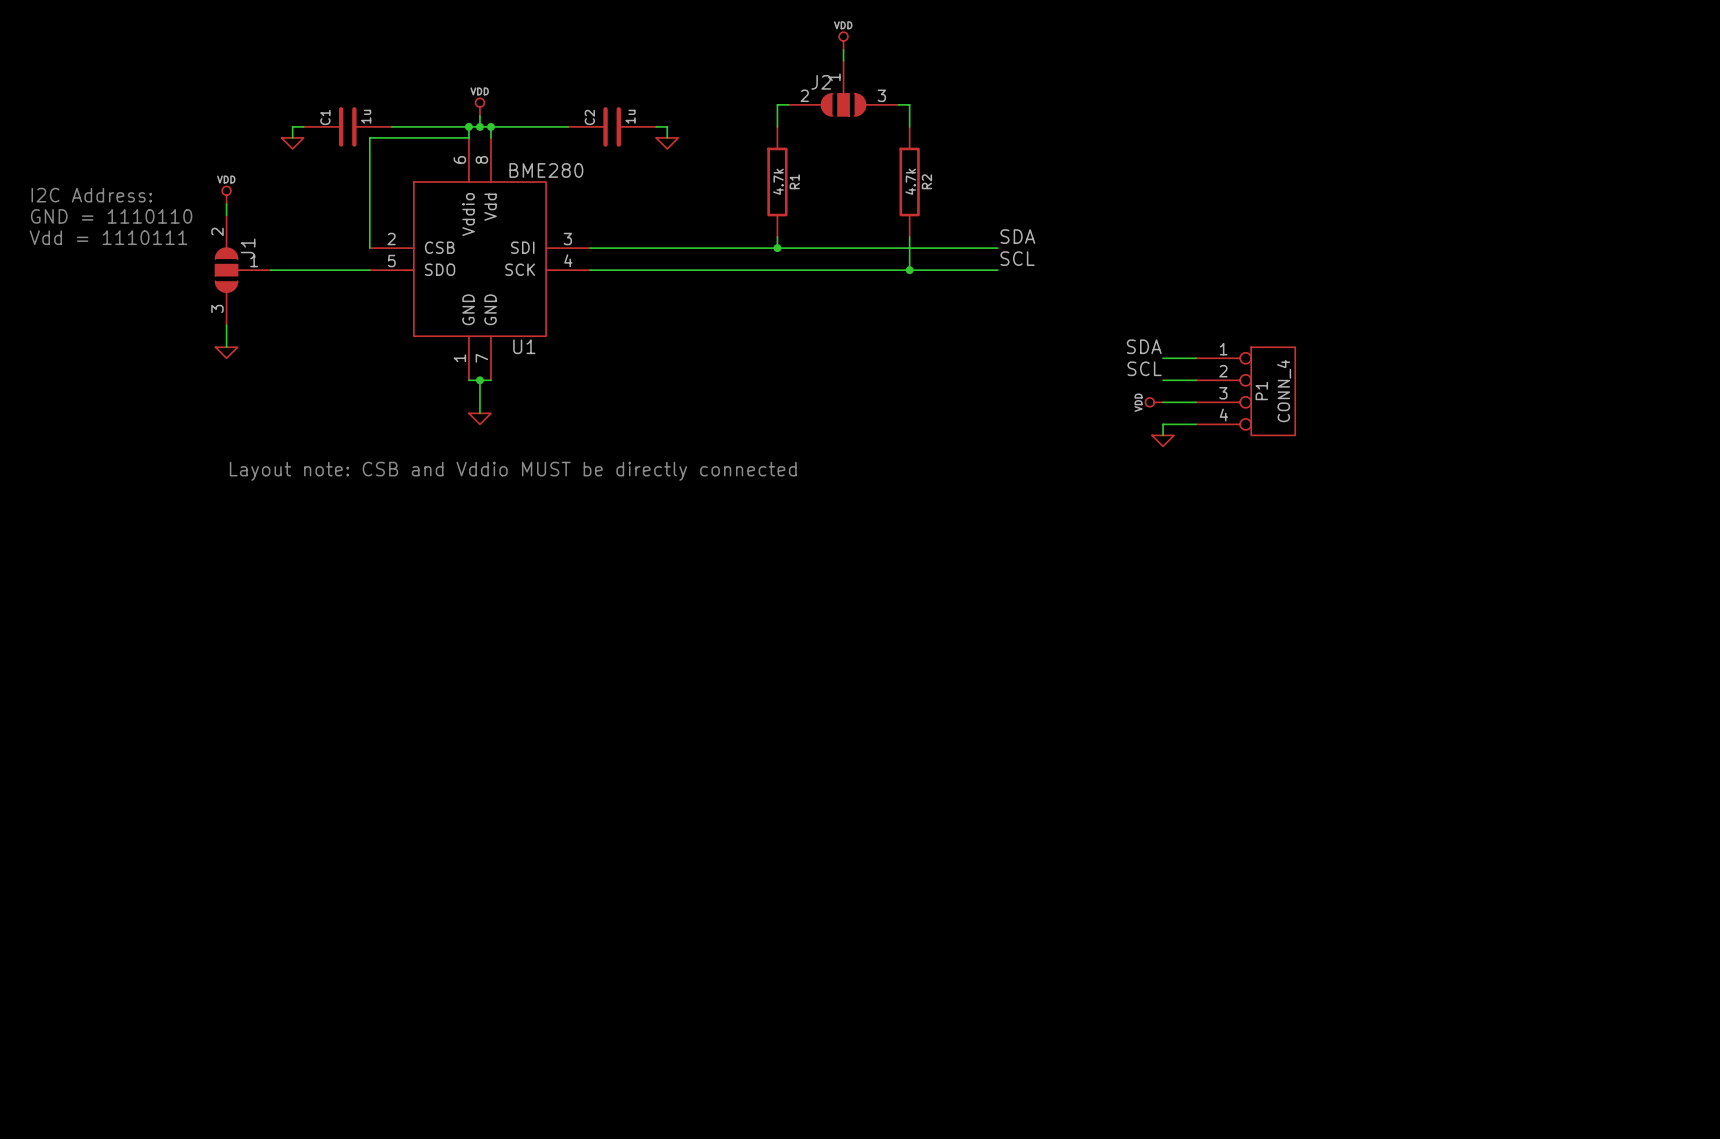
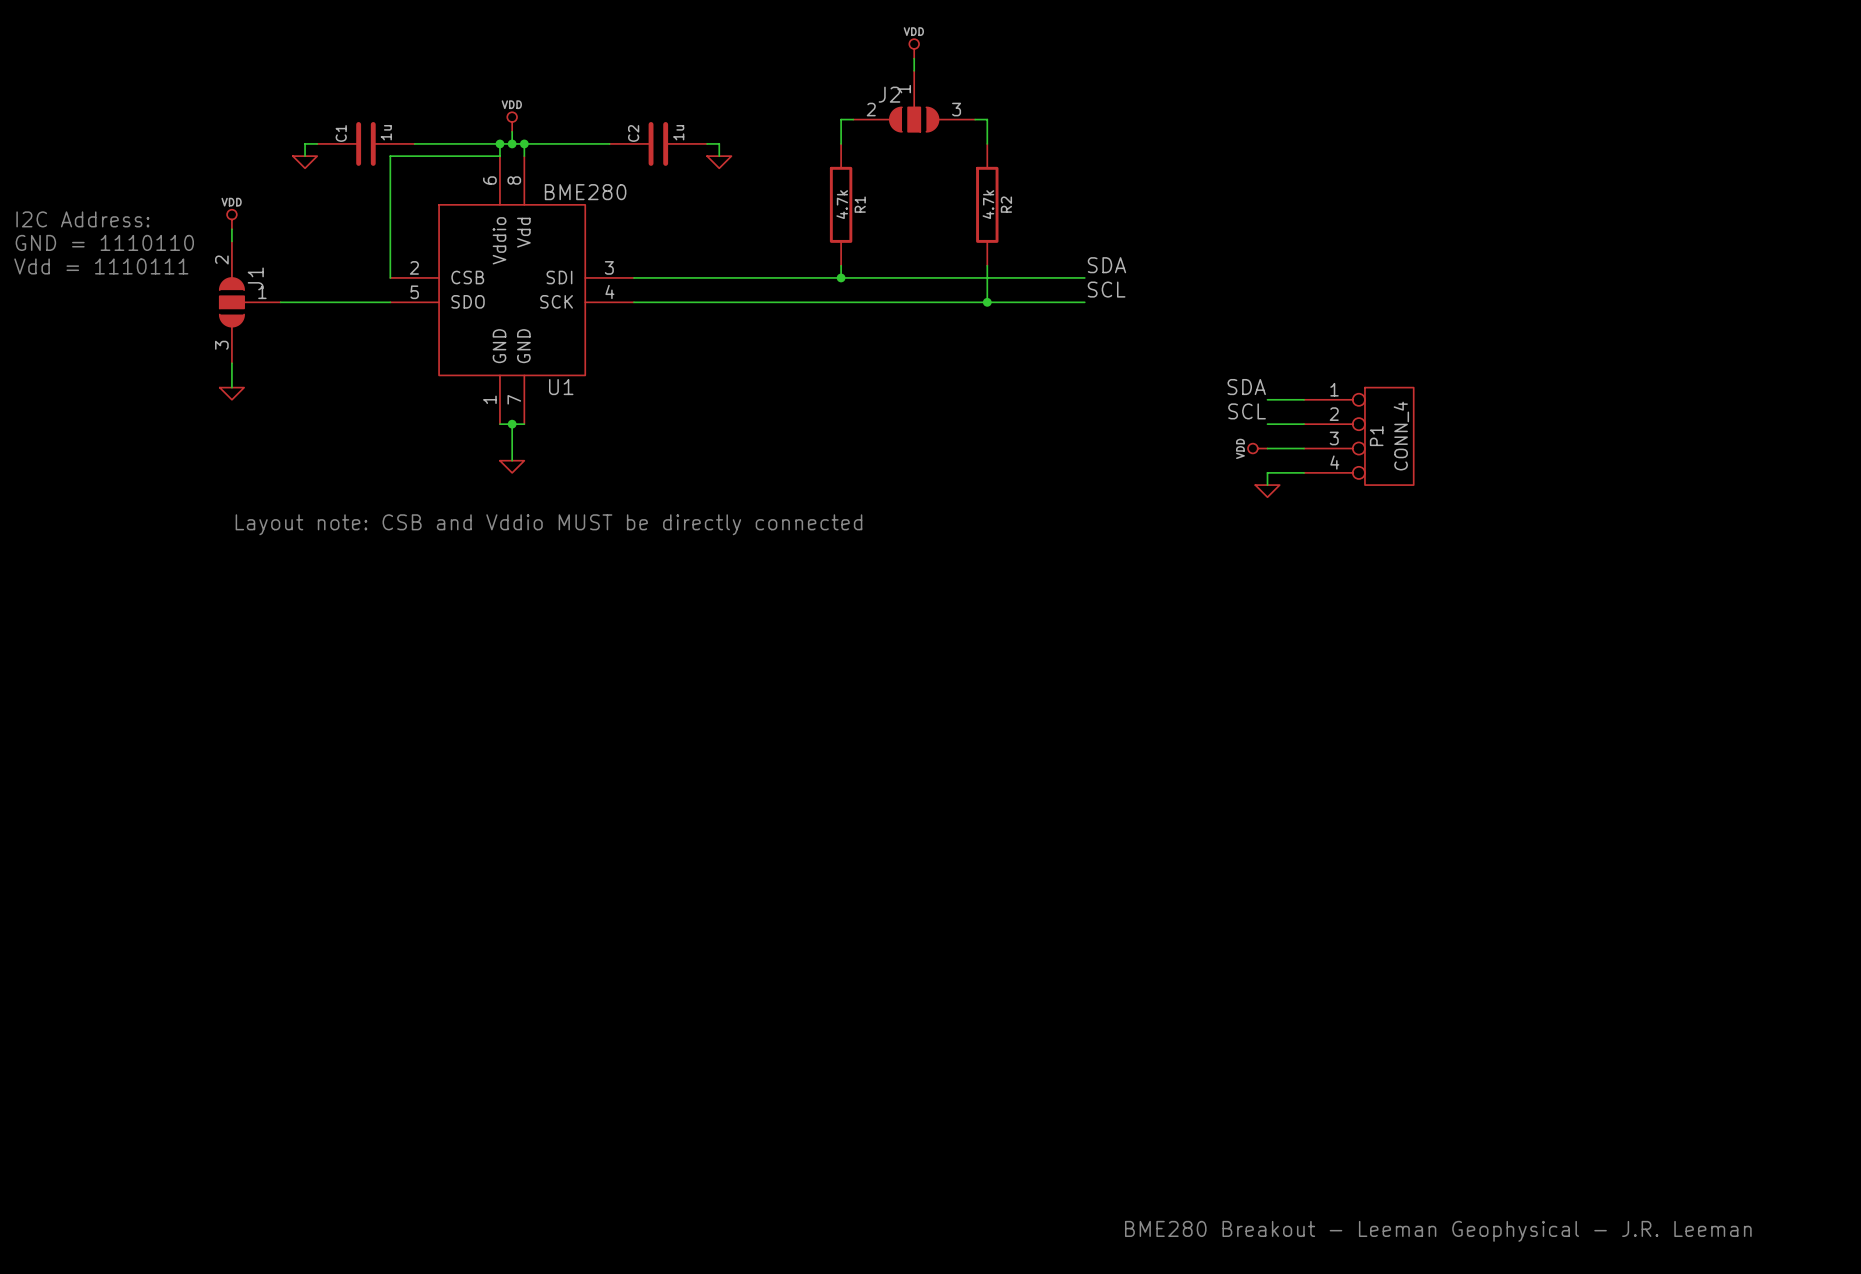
text: none -> BME280 Breakout - Leeman Geophysical - J.R. Leeman (1438, 1231)

